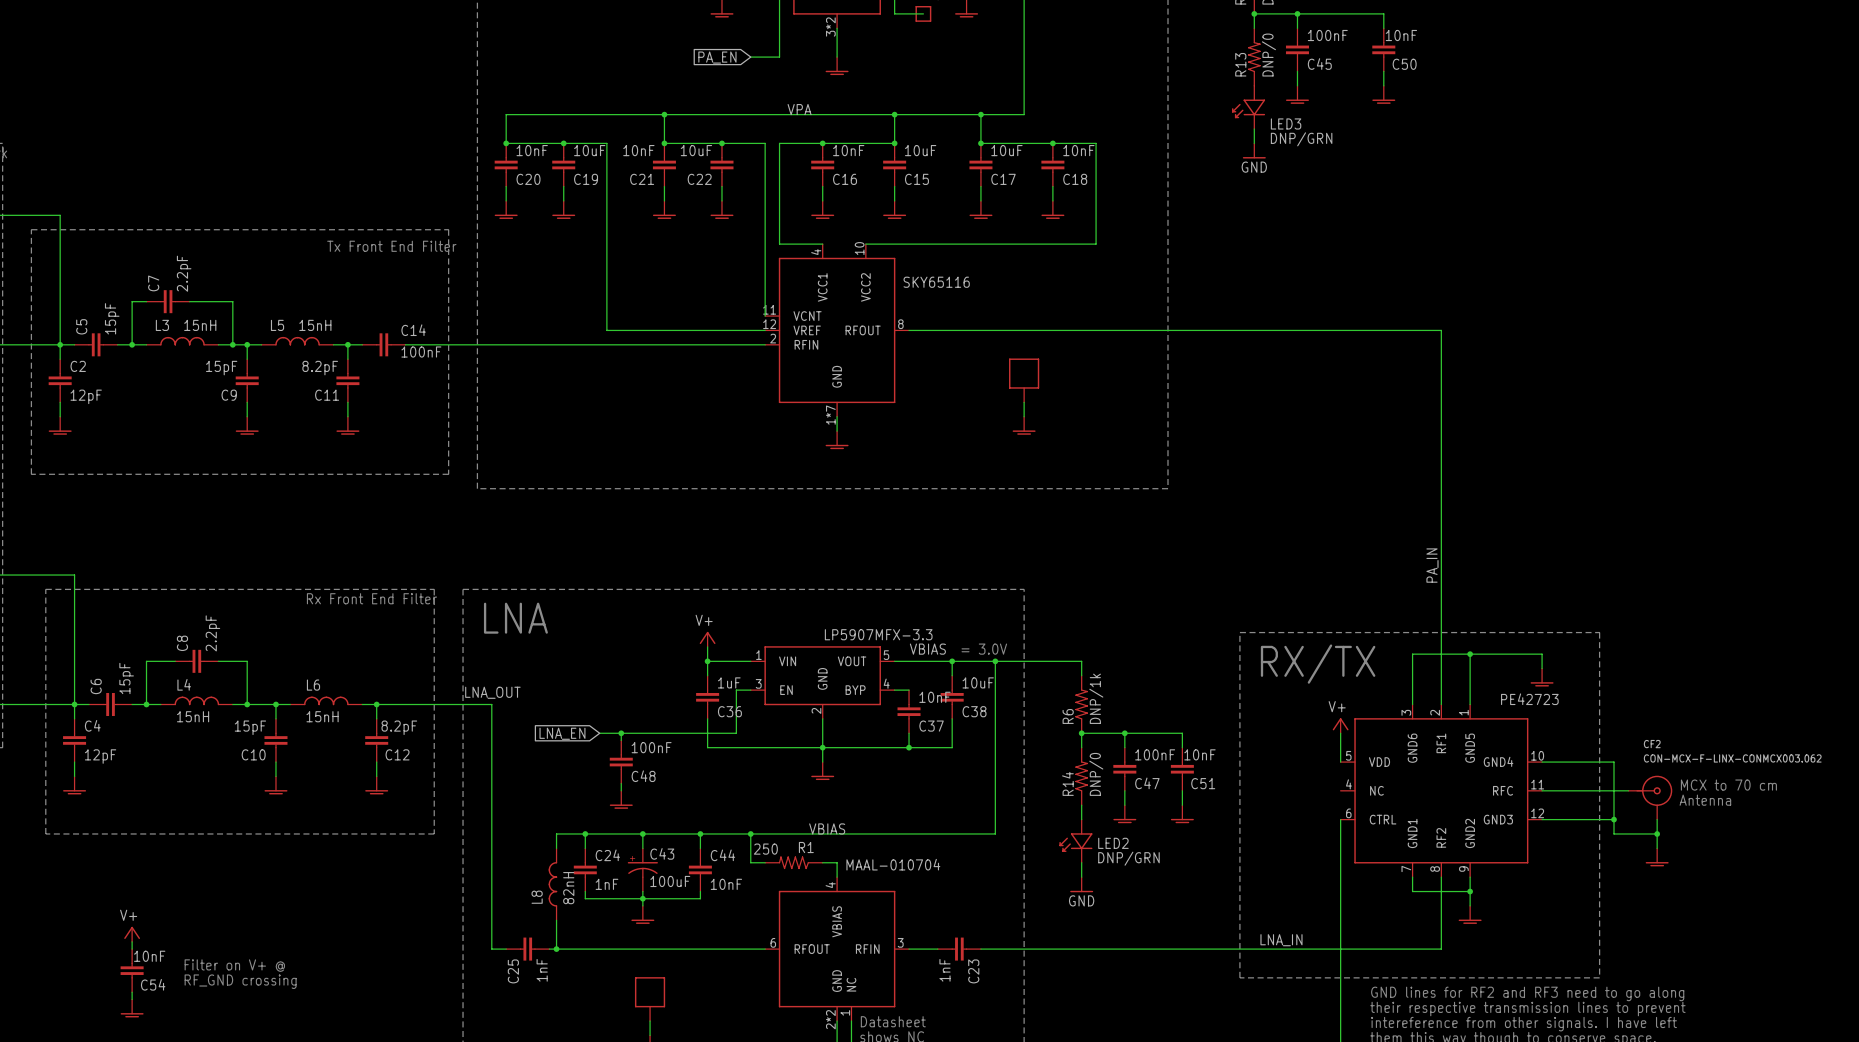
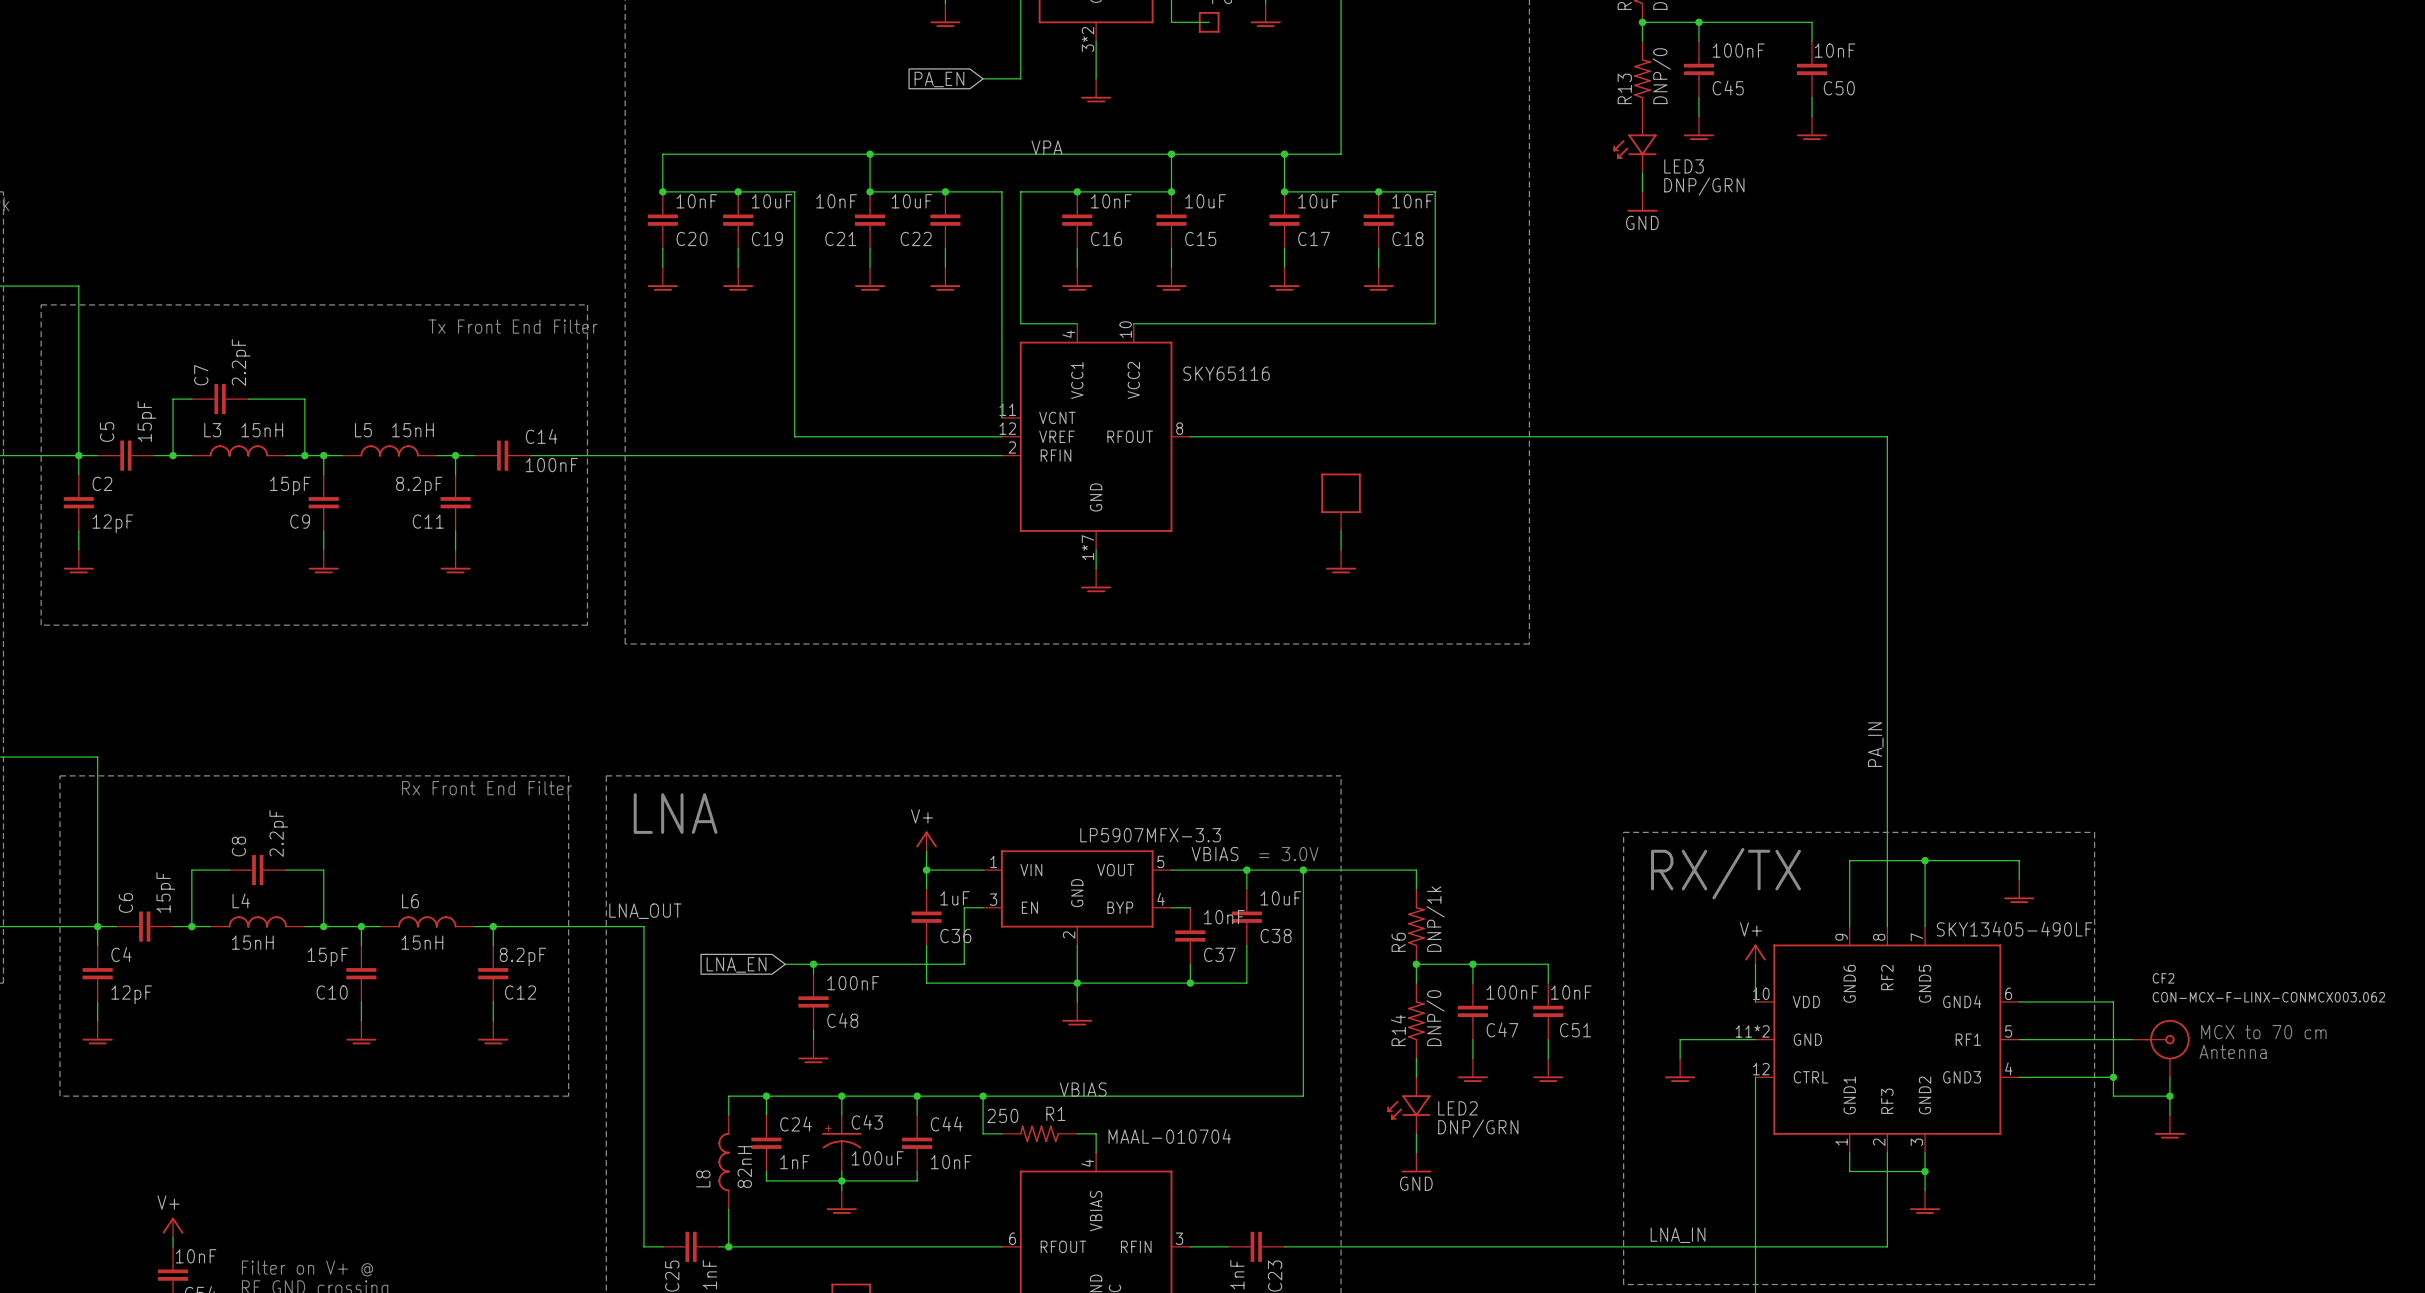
part value: PE42723 (1529, 699) -> SKY13405-490LF (2014, 929)
part symbol: [1340, 704, 1543, 878] -> [1755, 926, 2020, 1153]
wire: none -> (1755, 1039) (1680, 1039) (1680, 1058)
power symbol: none -> (1680, 1070)

